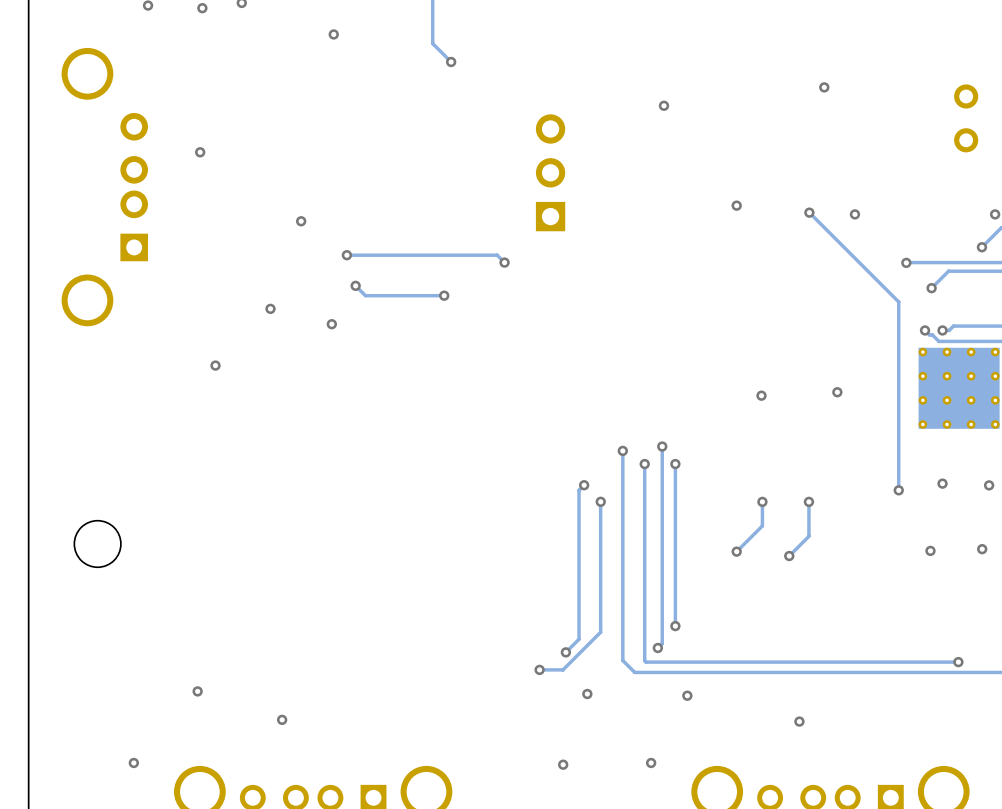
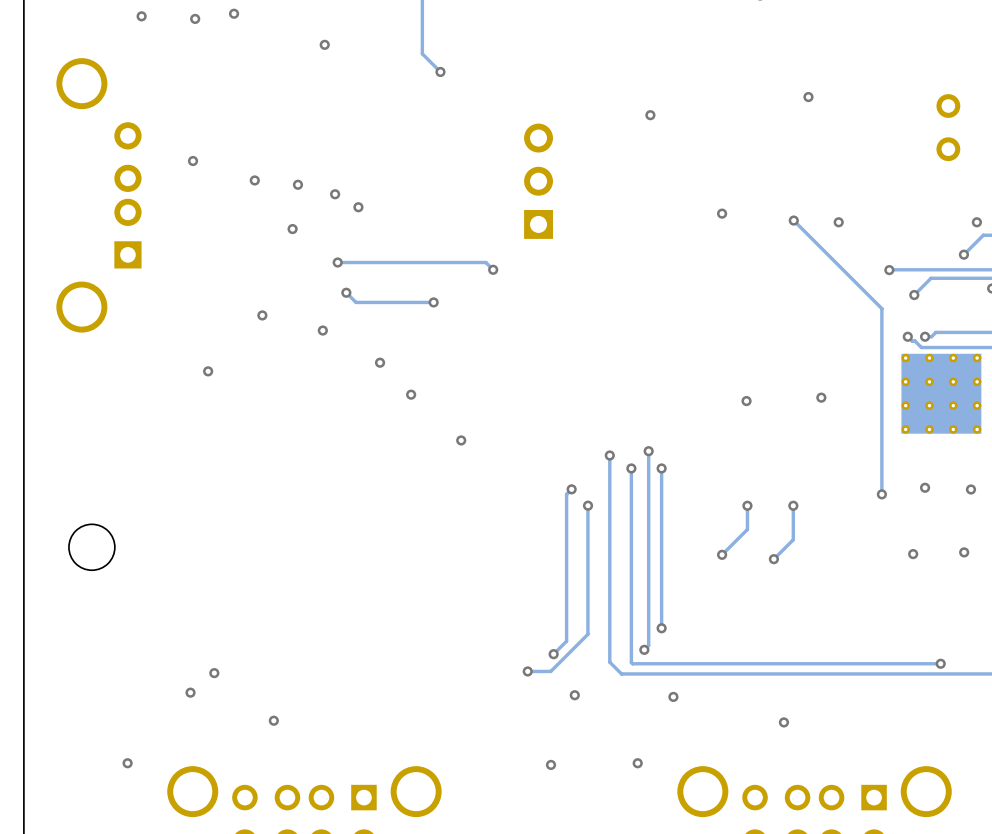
via: none -> (254, 180)
via: none -> (297, 184)
via: none -> (335, 194)
via: none -> (358, 207)
via: none -> (380, 362)
via: none -> (411, 394)
via: none -> (461, 440)
via: none -> (214, 673)

